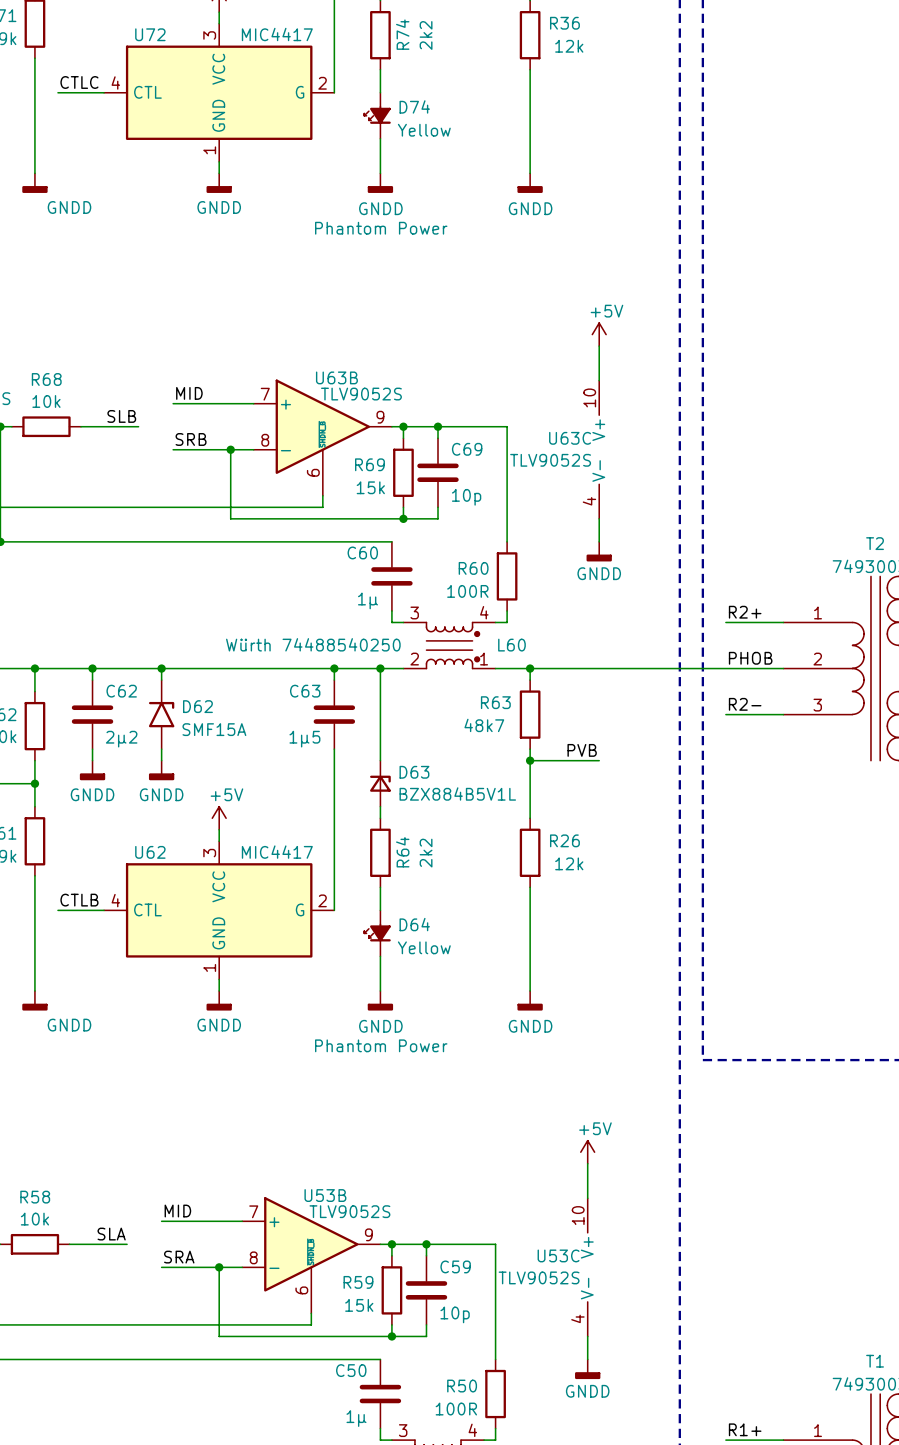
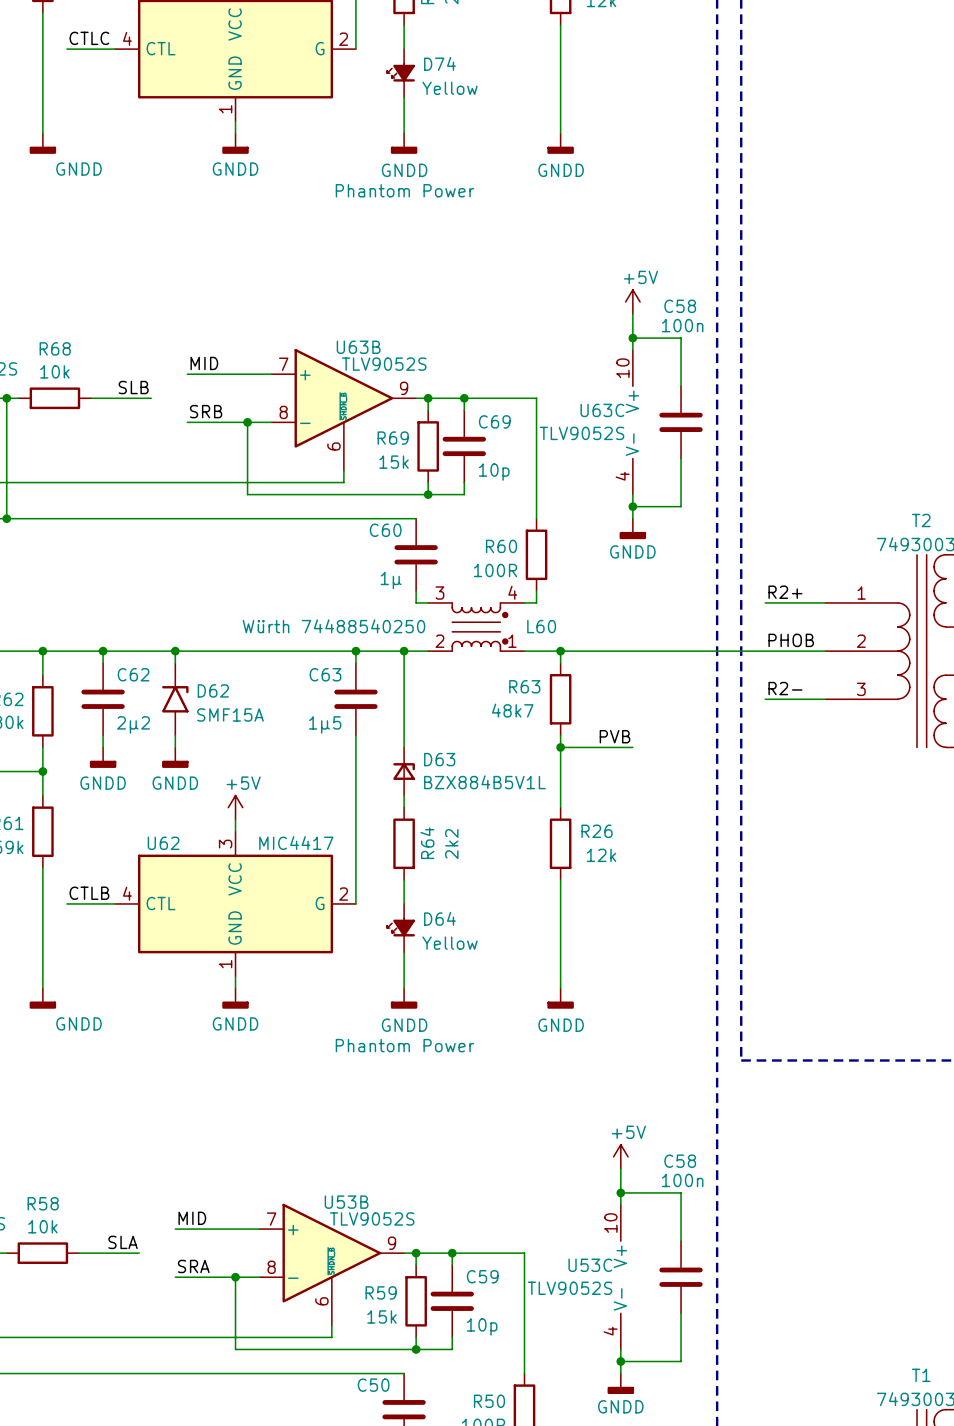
wire: none -> (632, 338) (681, 338) (681, 386)
junction: none -> (632, 338)
C58: none -> 100n (681, 422)
wire: none -> (681, 458) (681, 506) (632, 506)
junction: none -> (632, 506)
wire: none -> (620, 1192) (681, 1192) (681, 1241)
junction: none -> (620, 1192)
C58: none -> 100n (681, 1277)
wire: none -> (681, 1313) (681, 1361) (620, 1361)
junction: none -> (620, 1361)

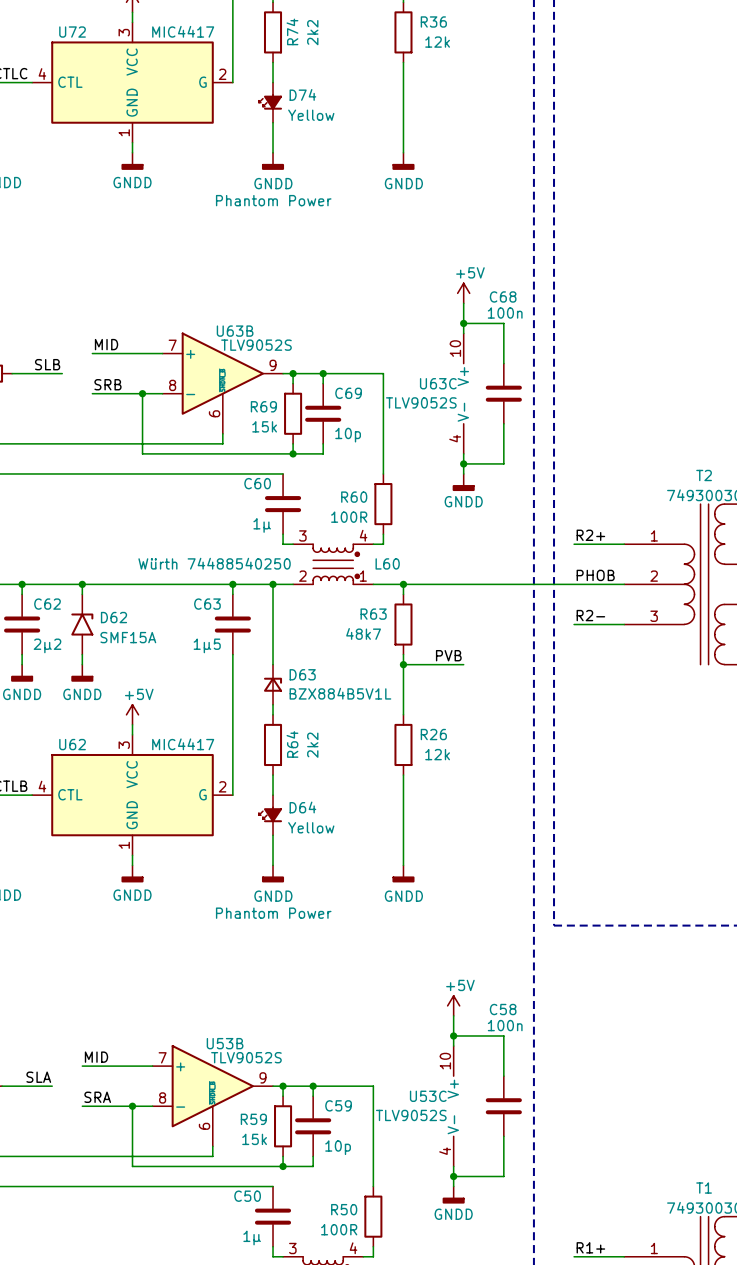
C58 name: C58 (680, 306) -> C68 (503, 296)

